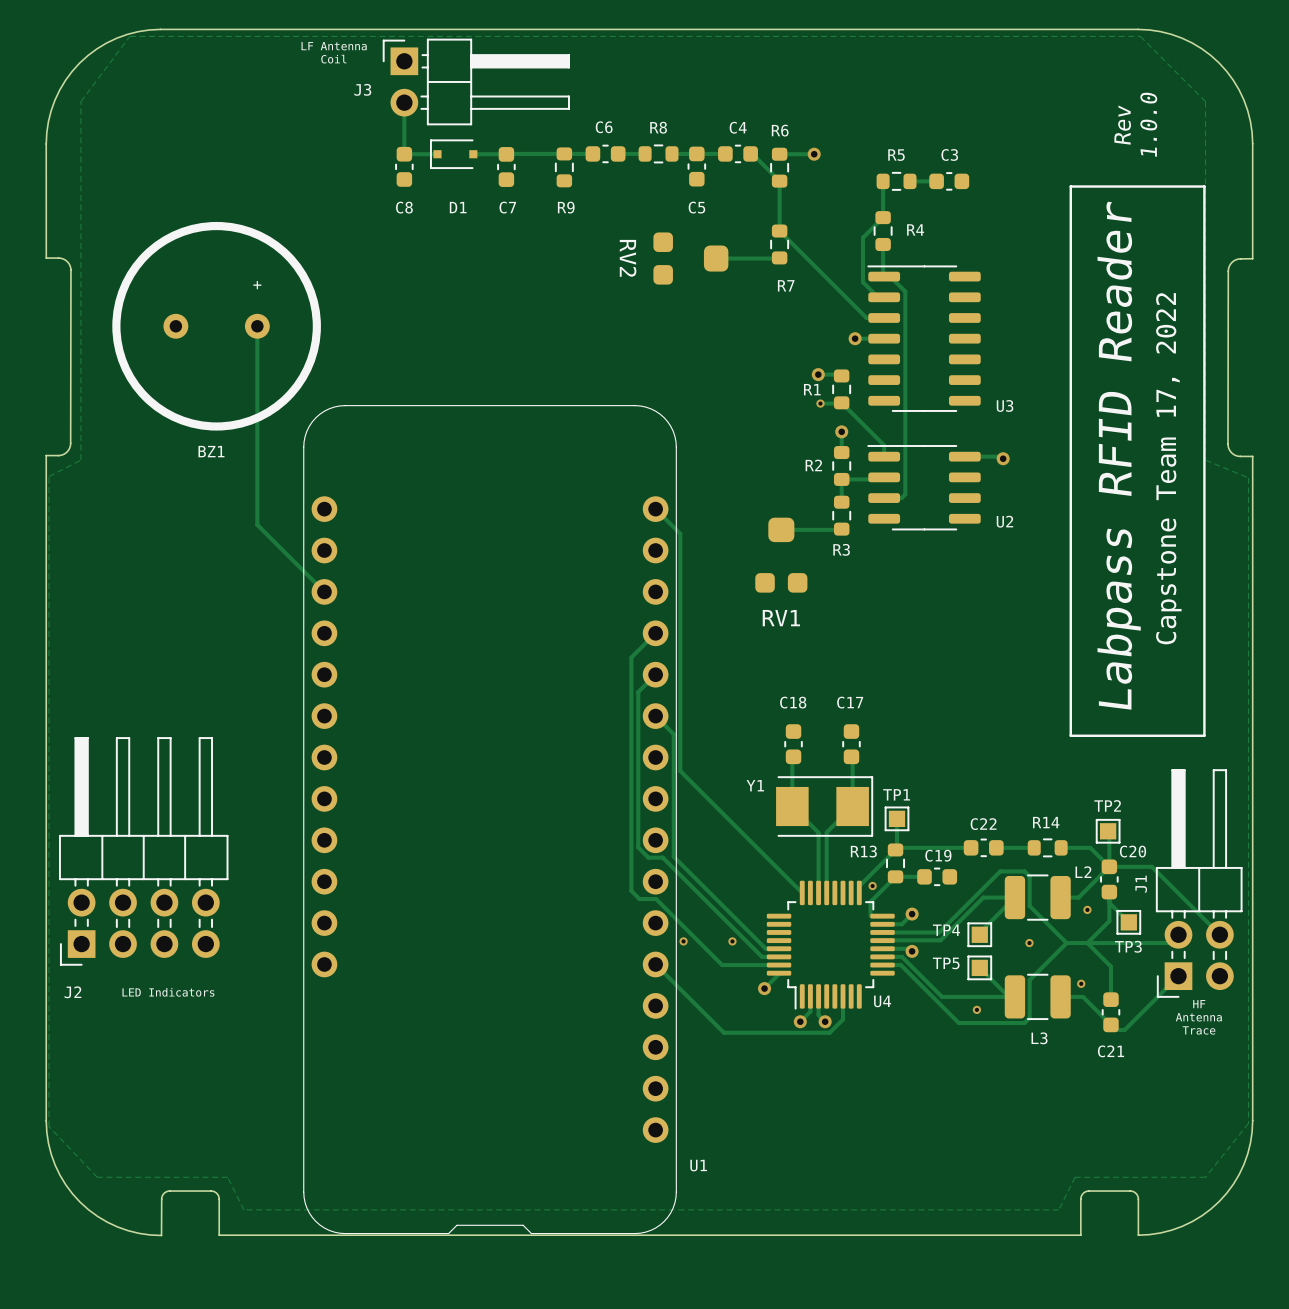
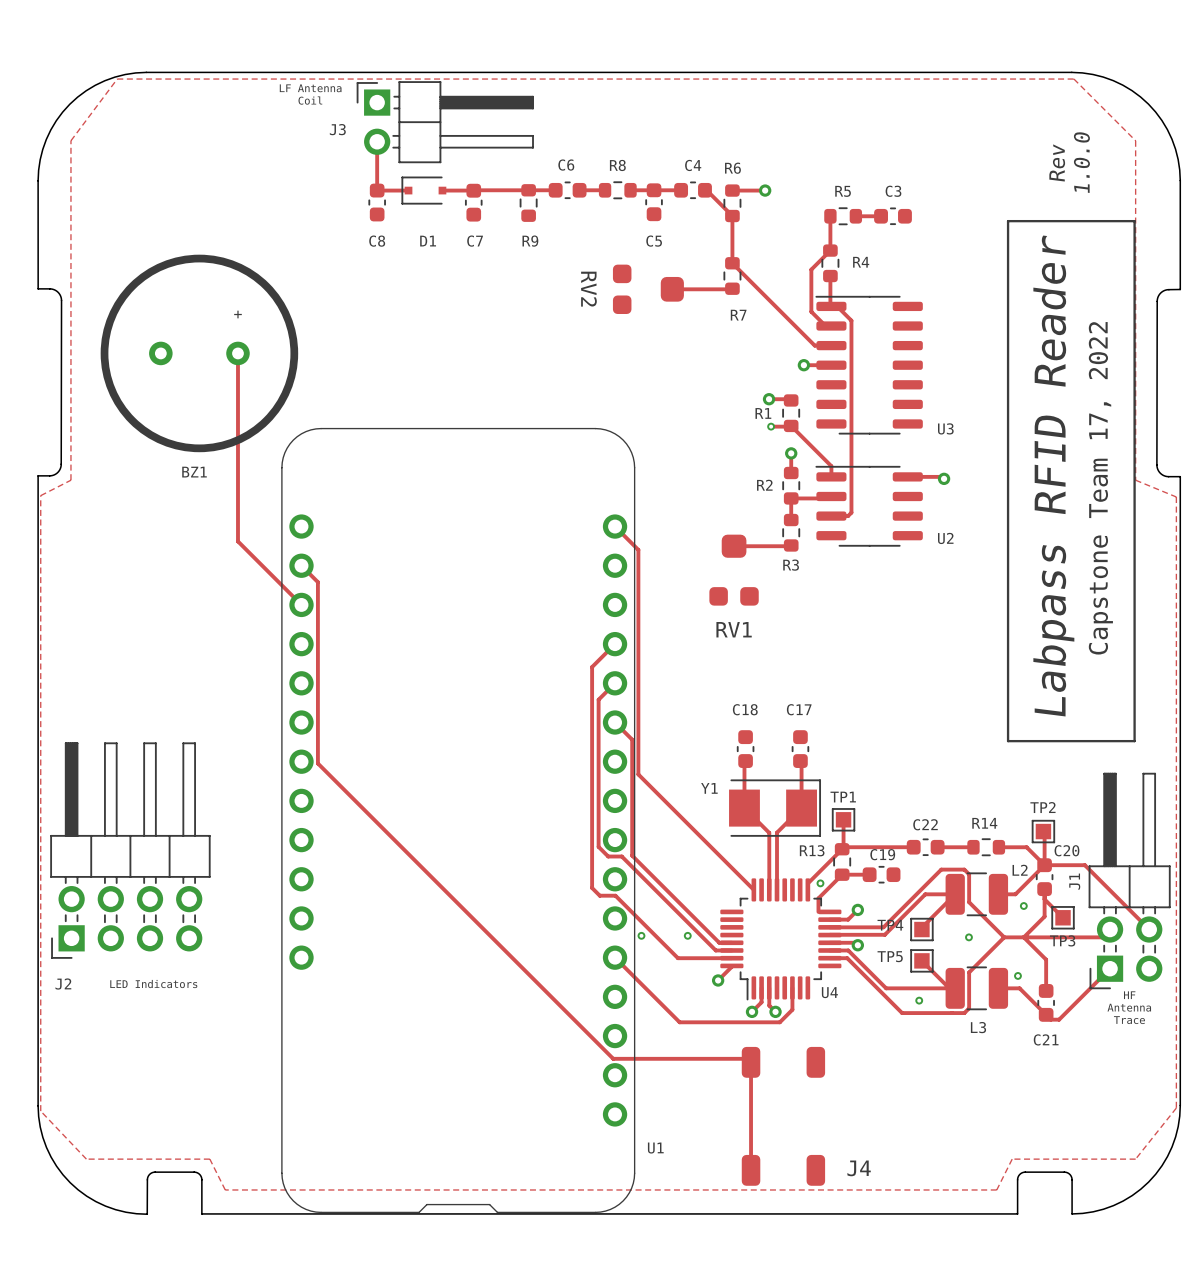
track: none -> (301, 565) (317, 582) (317, 763) (613, 1058) (747, 1058) (751, 1062) (751, 1170)
J4: none -> (783, 1116)

